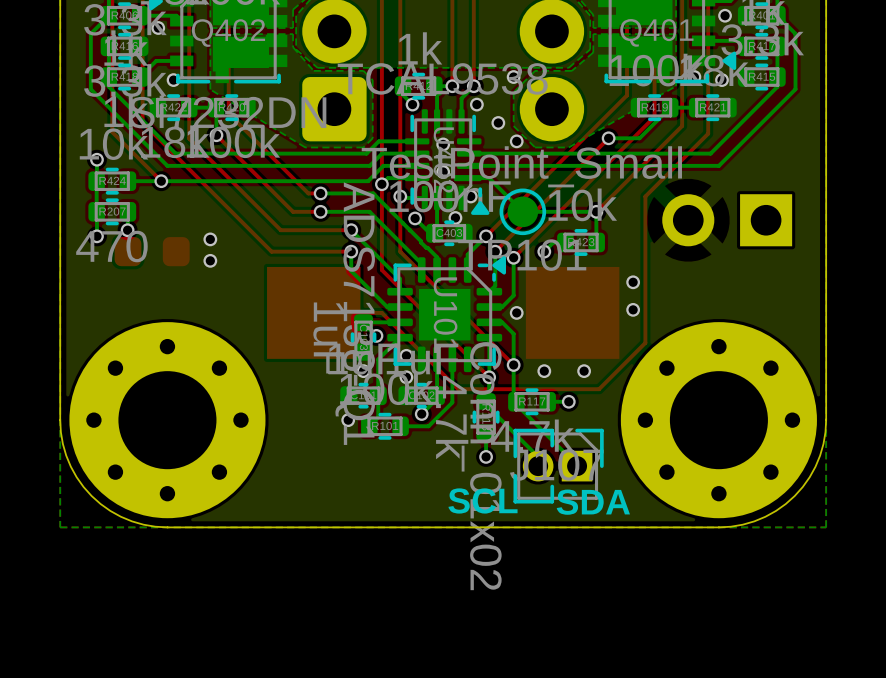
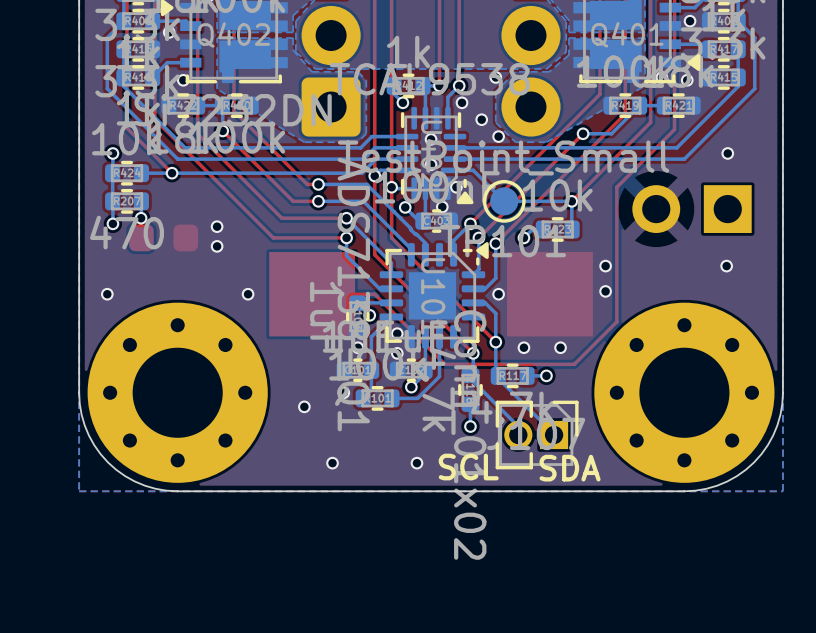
via: none -> (727, 153)
via: none -> (726, 266)
via: none -> (107, 294)
via: none -> (248, 294)
via: none -> (304, 406)
via: none -> (332, 463)
via: none -> (416, 463)

